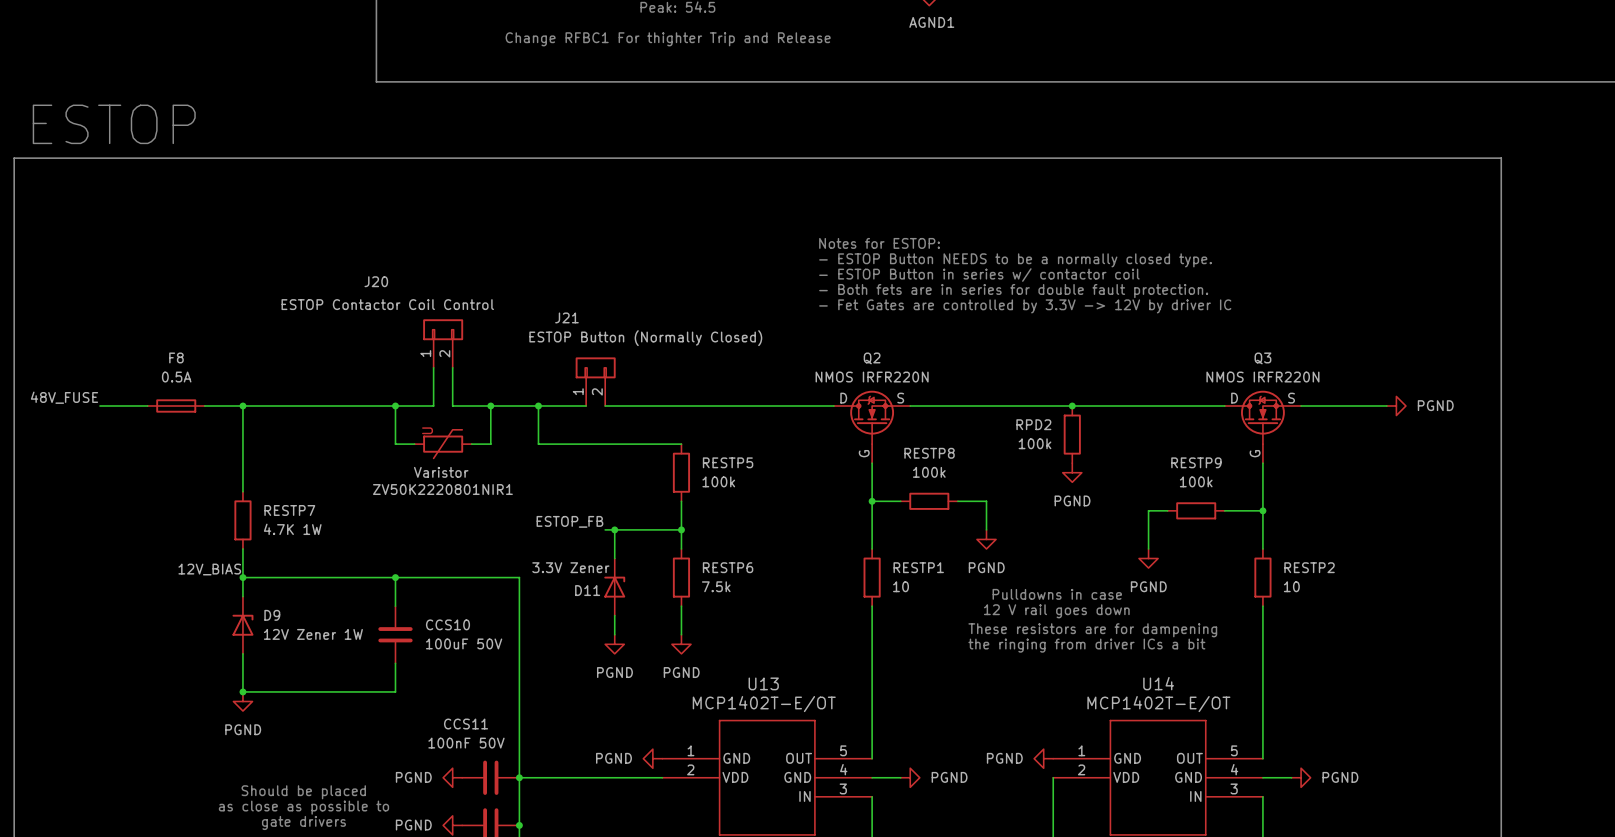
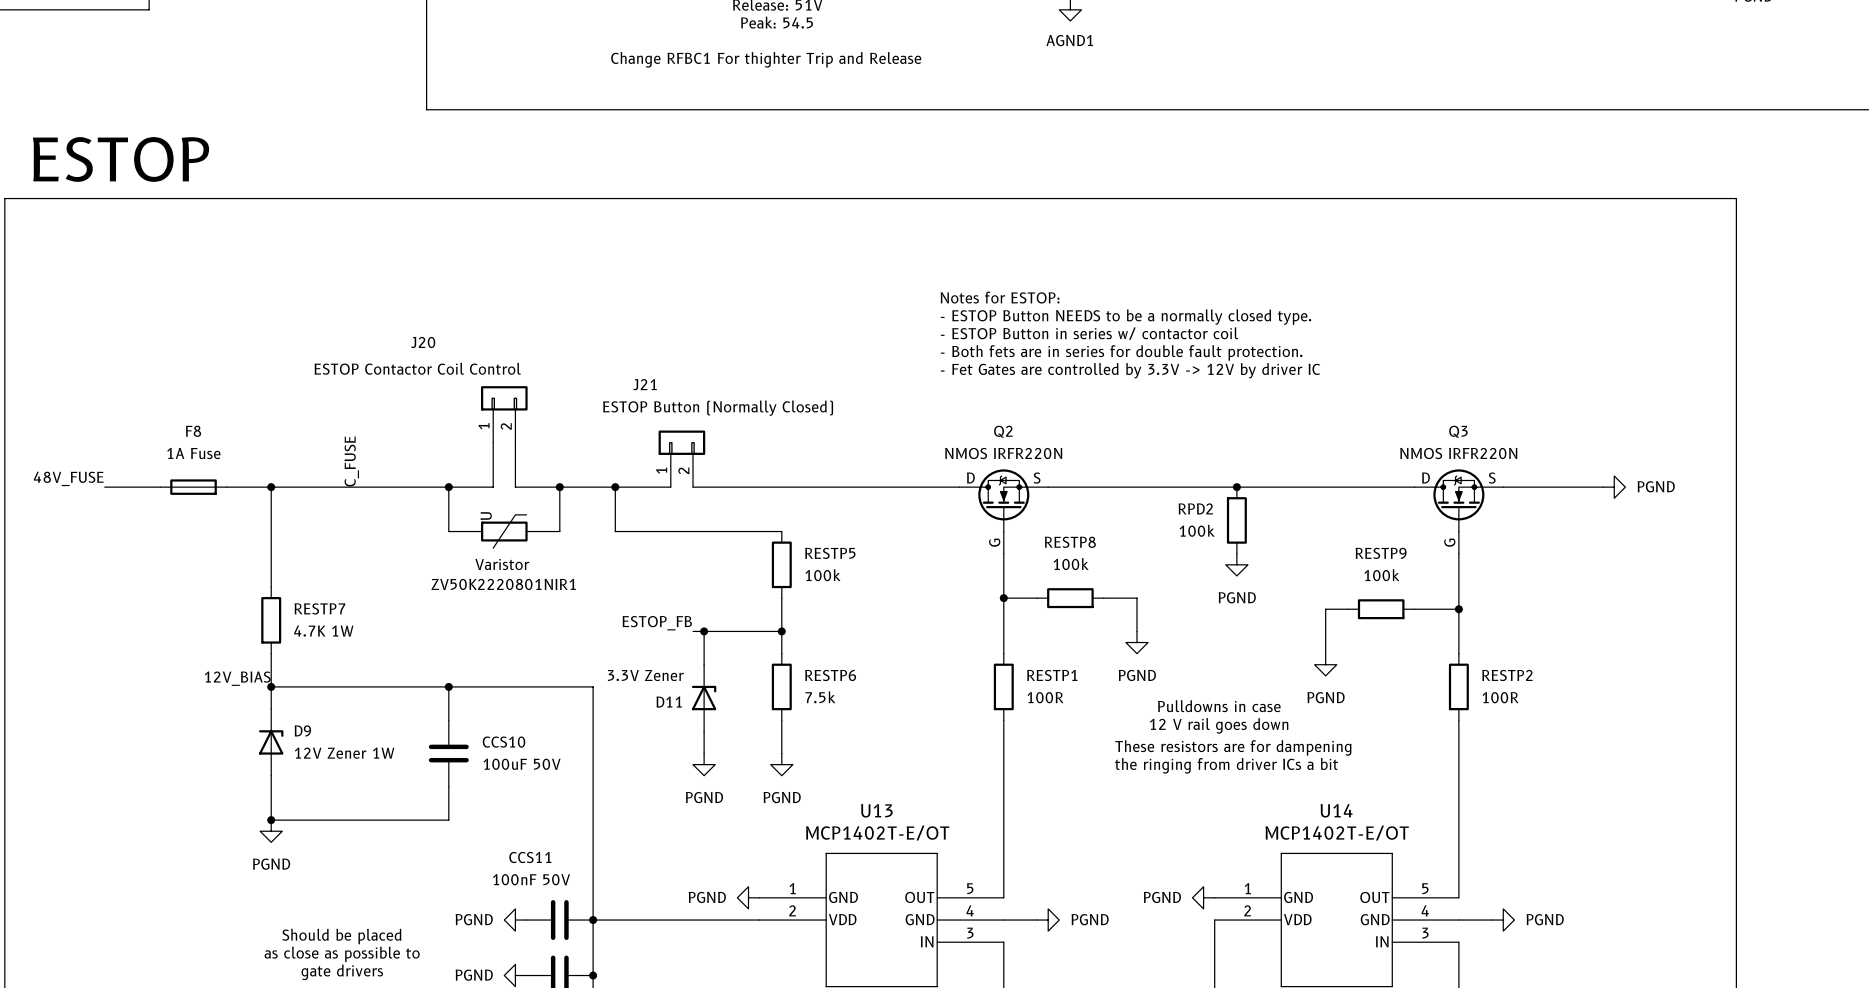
F8 value: 0.5A (176, 377) -> 1A Fuse (193, 453)
label: none -> C_FUSE (351, 461)
RESTP1 value: 10 (901, 586) -> 100R (1045, 697)
RESTP2 value: 10 (1291, 586) -> 100R (1500, 697)

